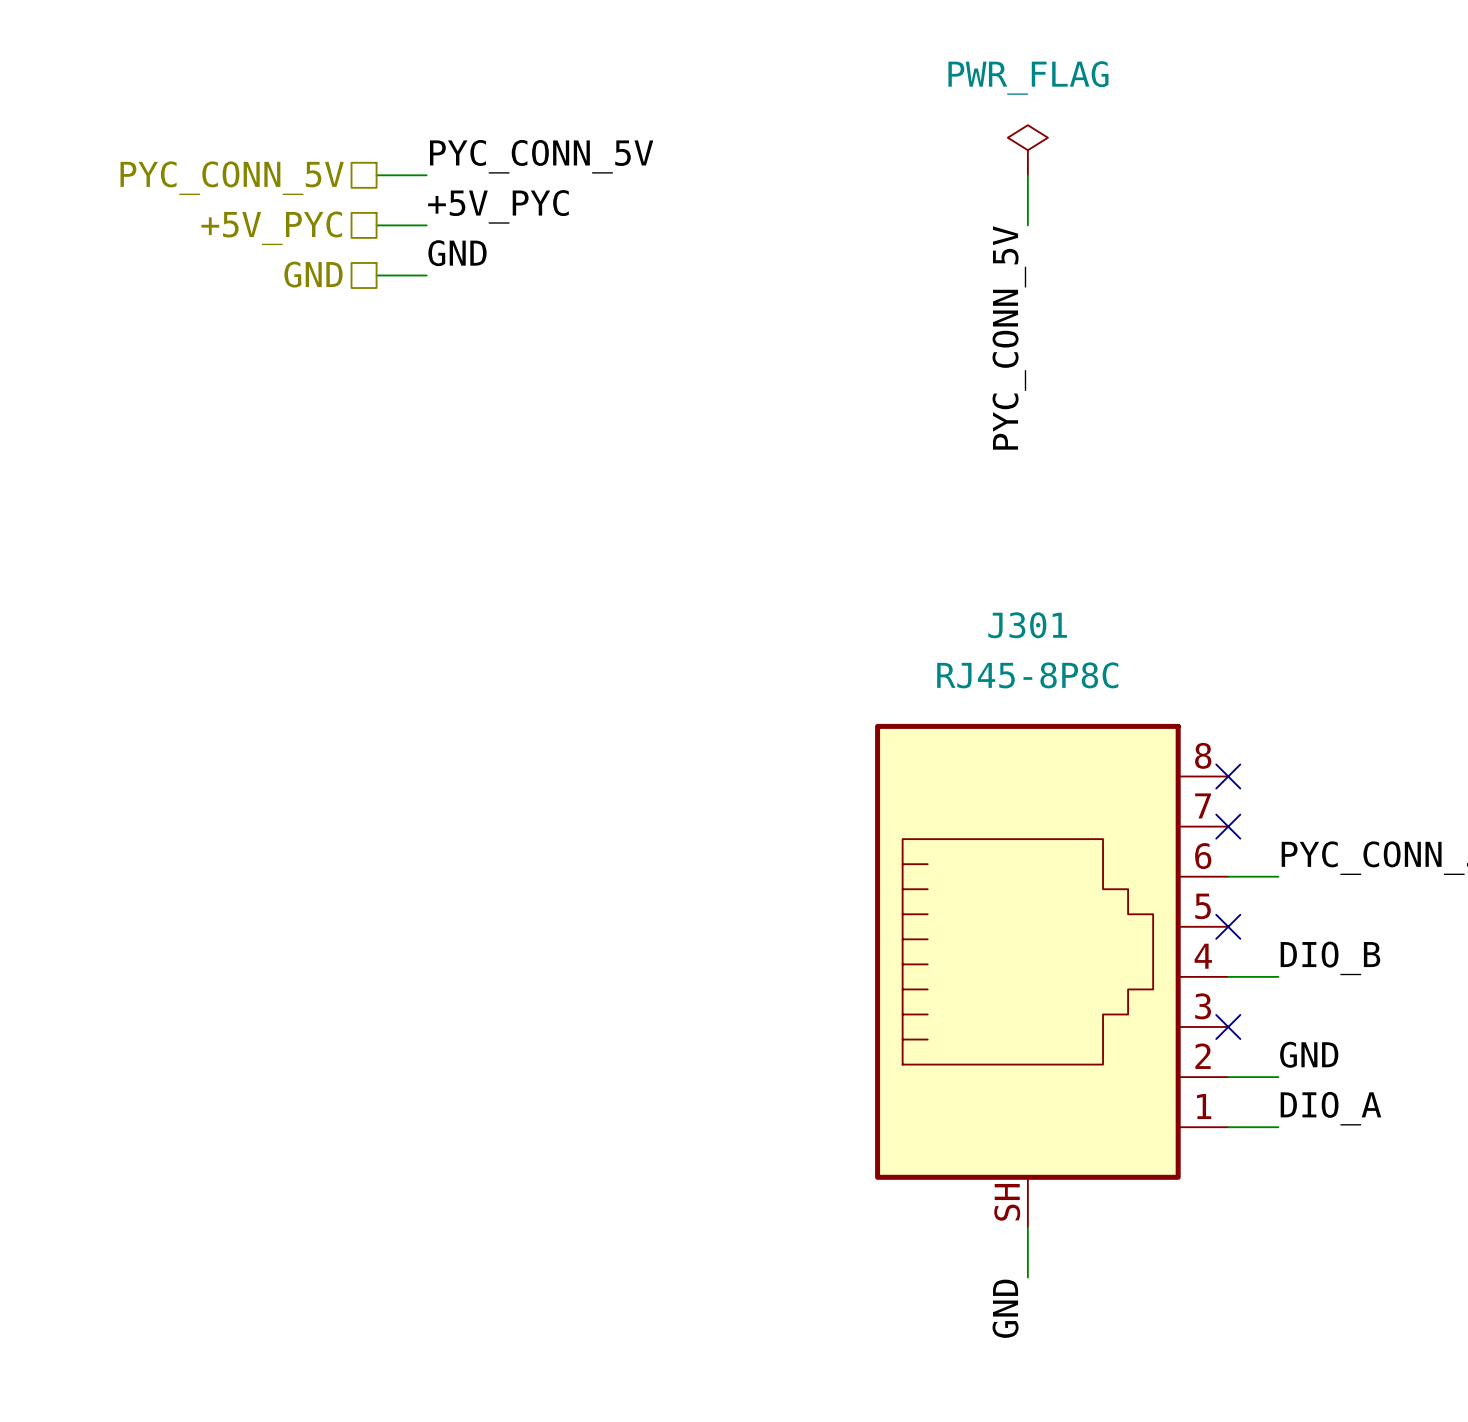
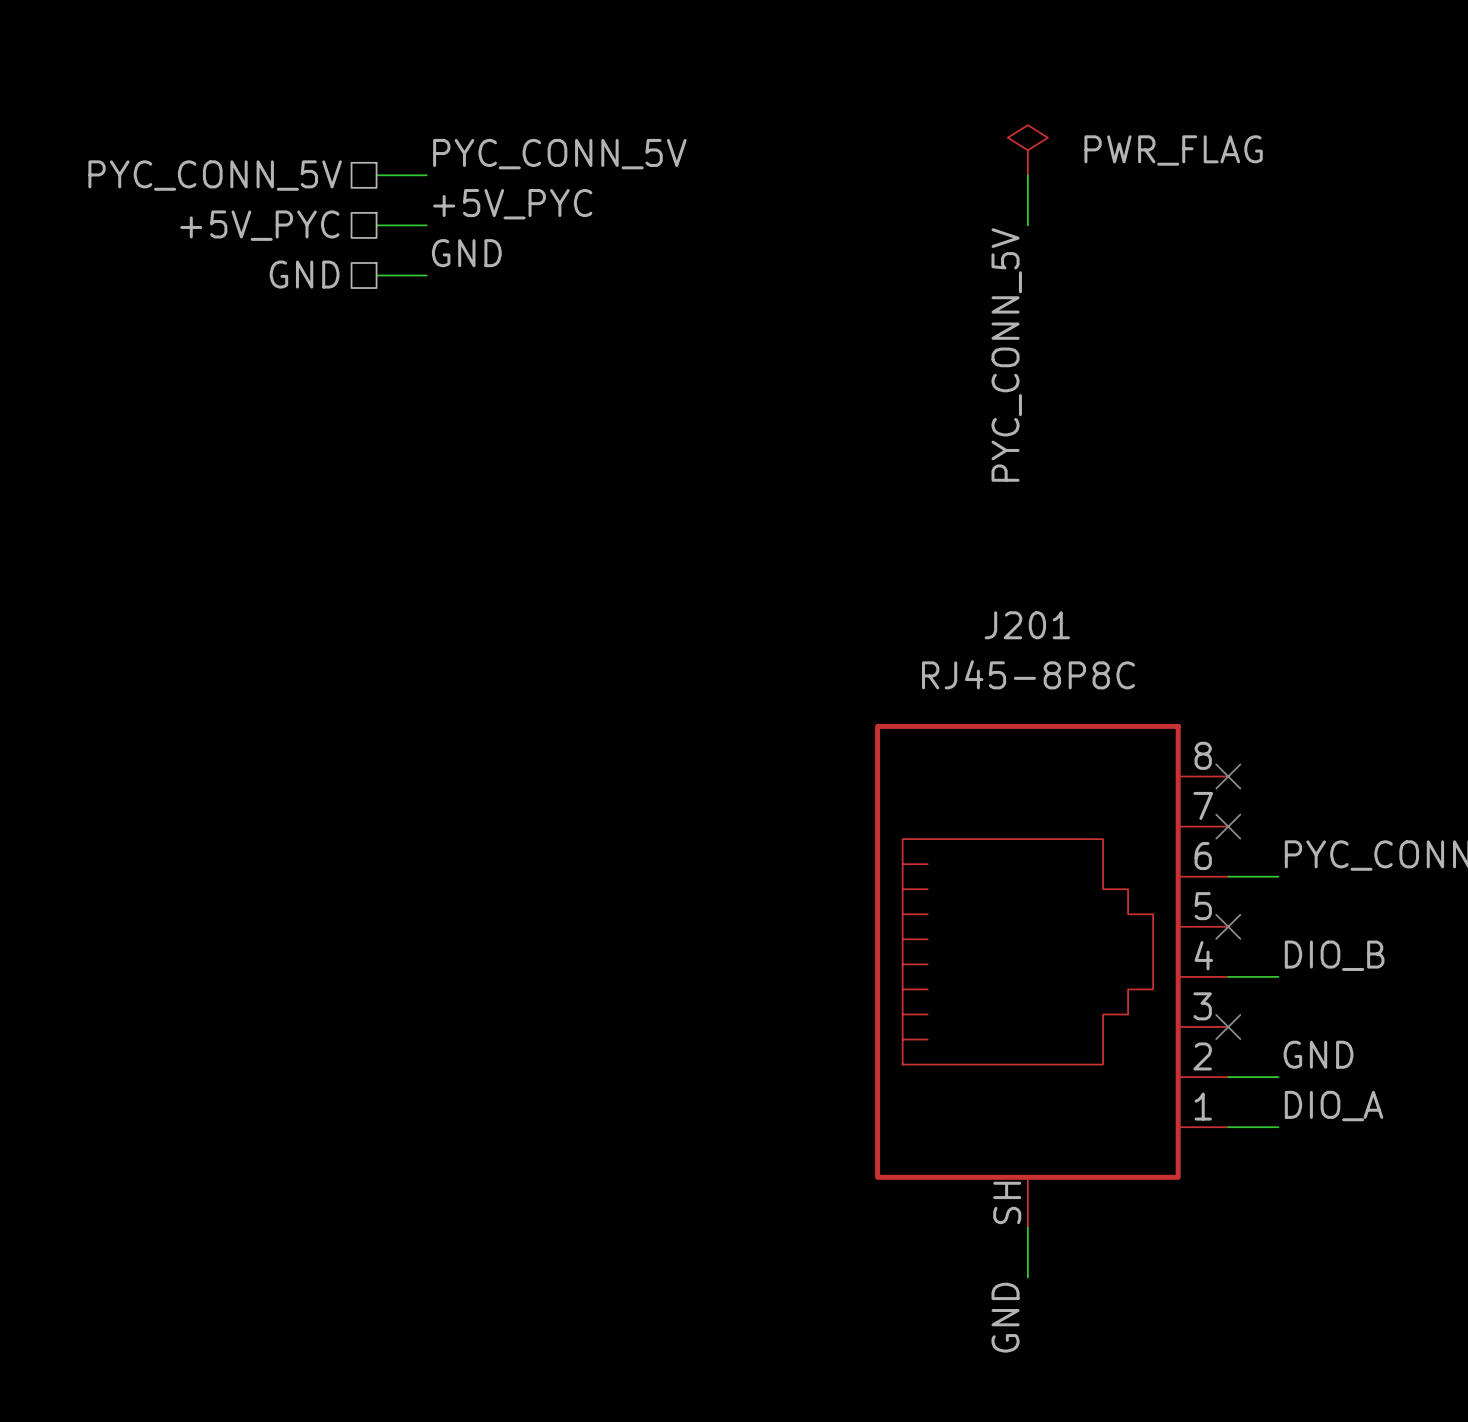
power symbol text position: PWR_FLAG (1028, 77) -> PWR_FLAG (1173, 150)
J301 name: J301 (1027, 625) -> J201 (1027, 625)

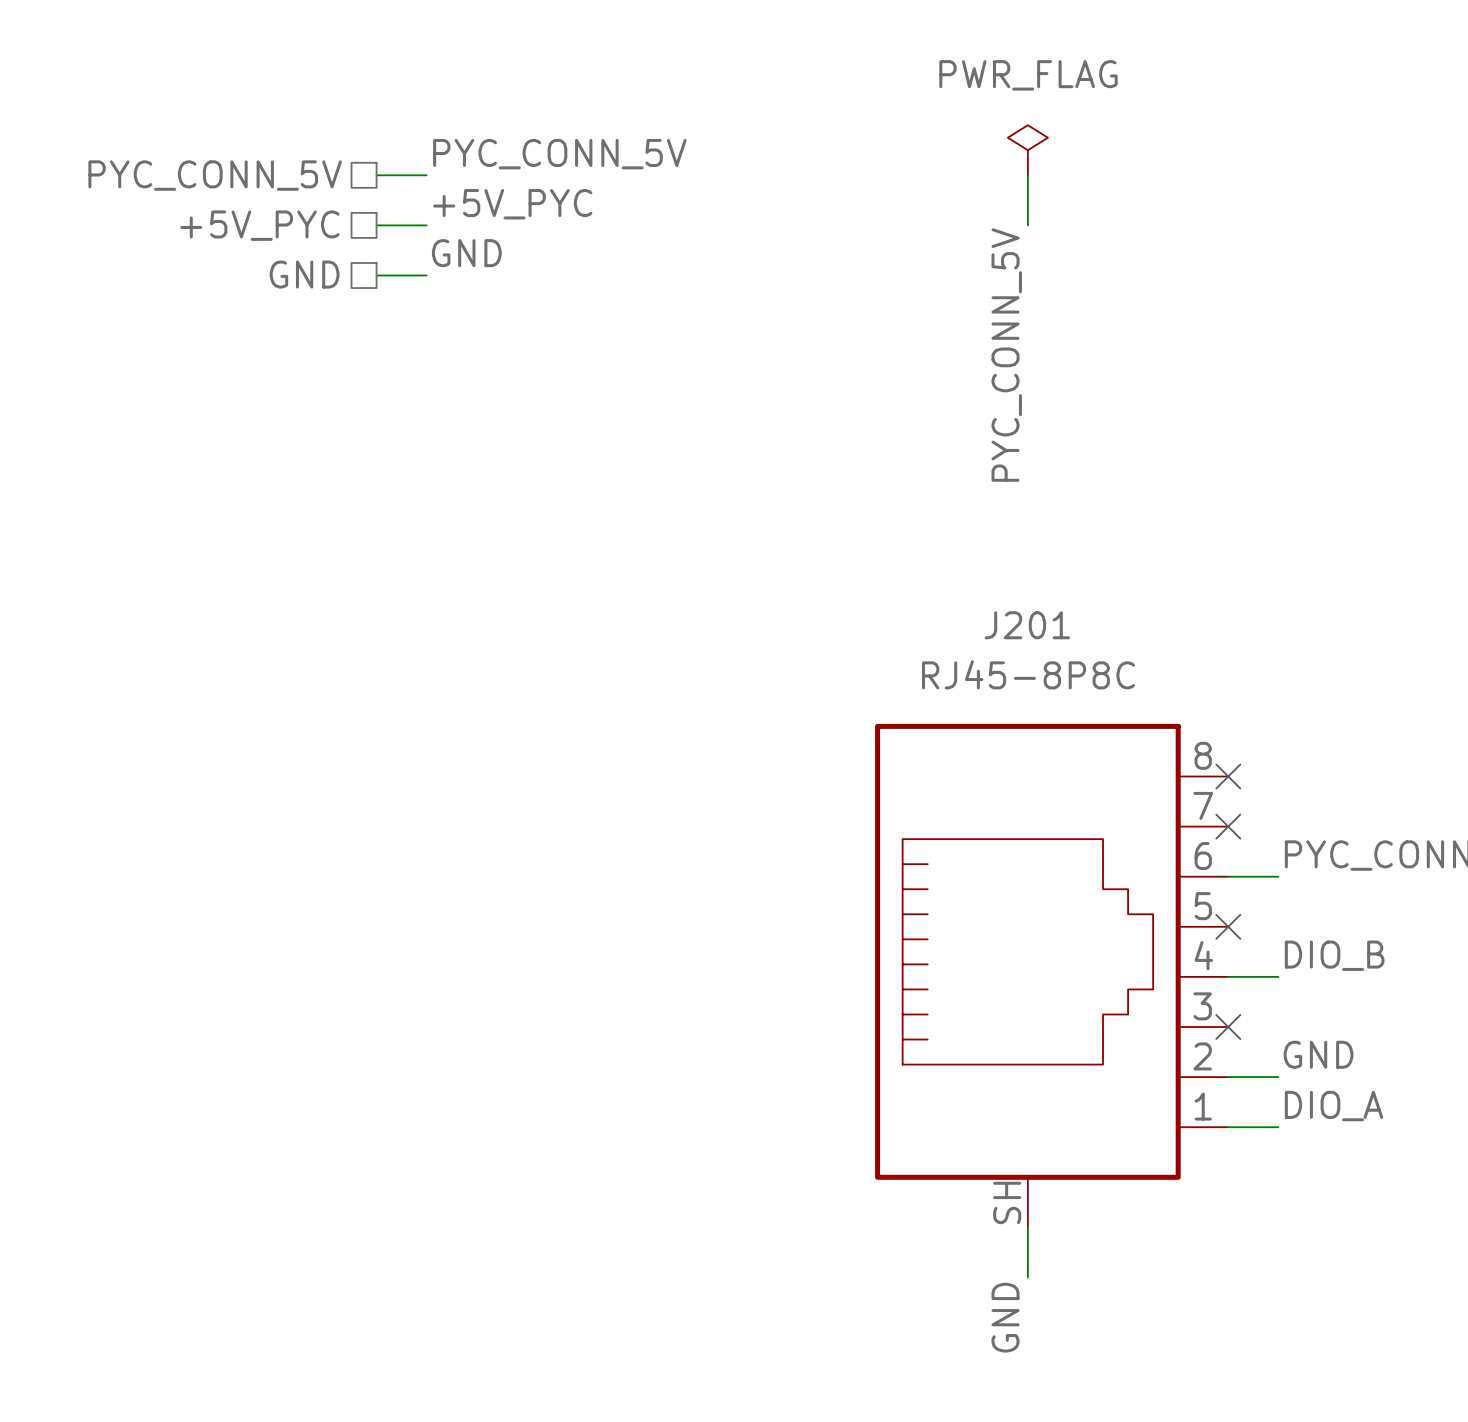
power symbol text position: PWR_FLAG (1173, 150) -> PWR_FLAG (1028, 75)

